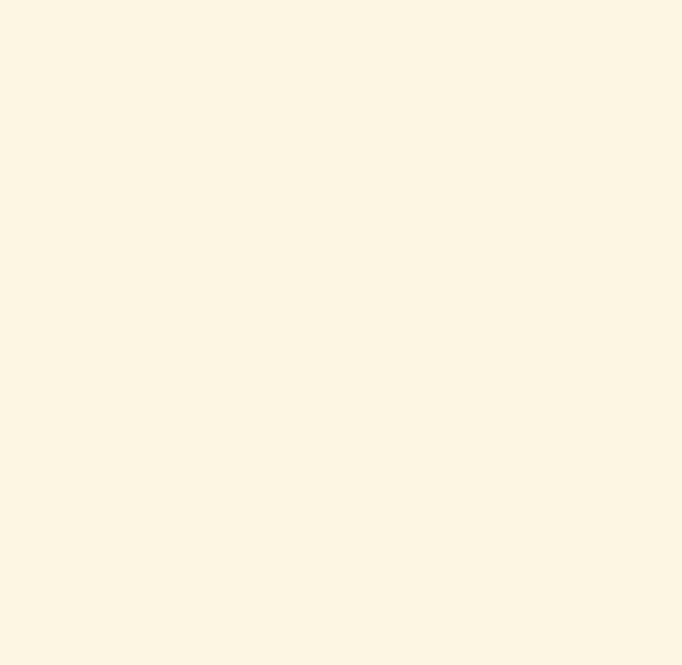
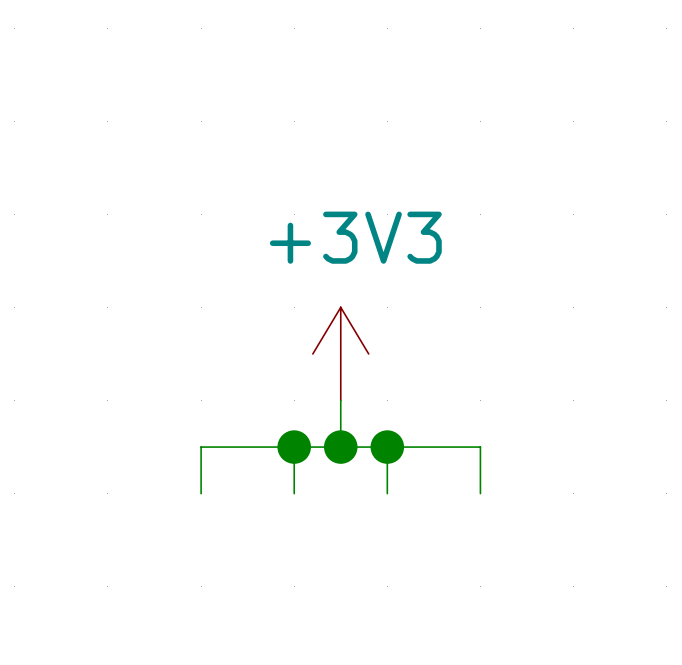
power symbol: none -> +3V3 (340, 353)
wire: none -> (340, 400) (340, 447)
wire: none -> (294, 447) (294, 493)
junction: none -> (294, 447)
junction: none -> (340, 447)
wire: none -> (387, 447) (387, 493)
junction: none -> (387, 447)
wire: none -> (201, 493) (201, 447) (480, 447) (480, 493)

